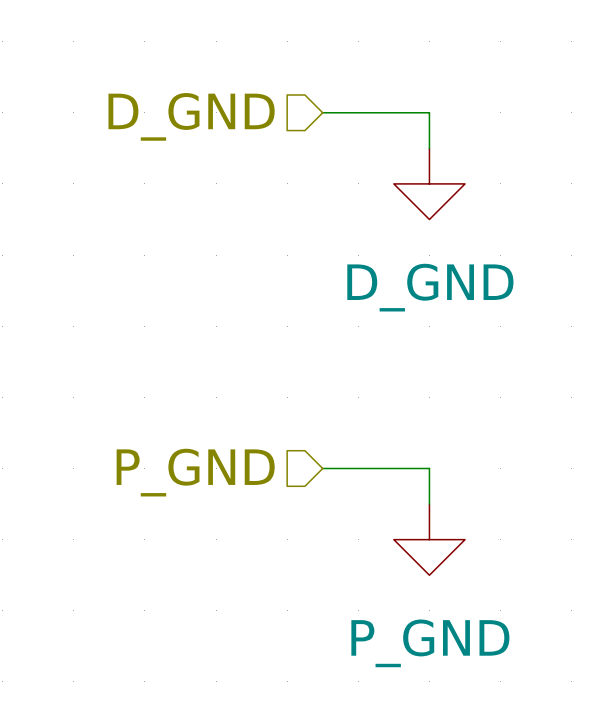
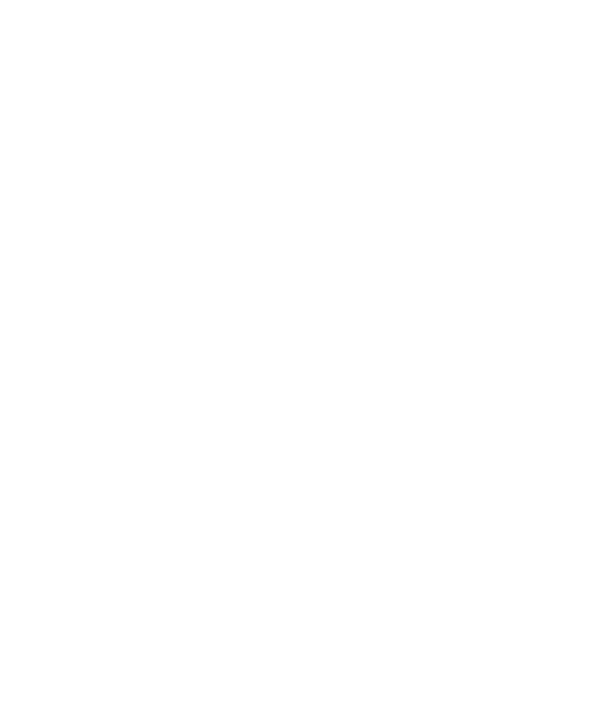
wire: (322, 112) (429, 112) (429, 148) -> none
hierarchical label: D_GND (191, 116) -> none
power symbol: D_GND (429, 183) -> none
wire: (322, 468) (429, 468) (429, 504) -> none
hierarchical label: P_GND (195, 472) -> none
power symbol: P_GND (429, 539) -> none

